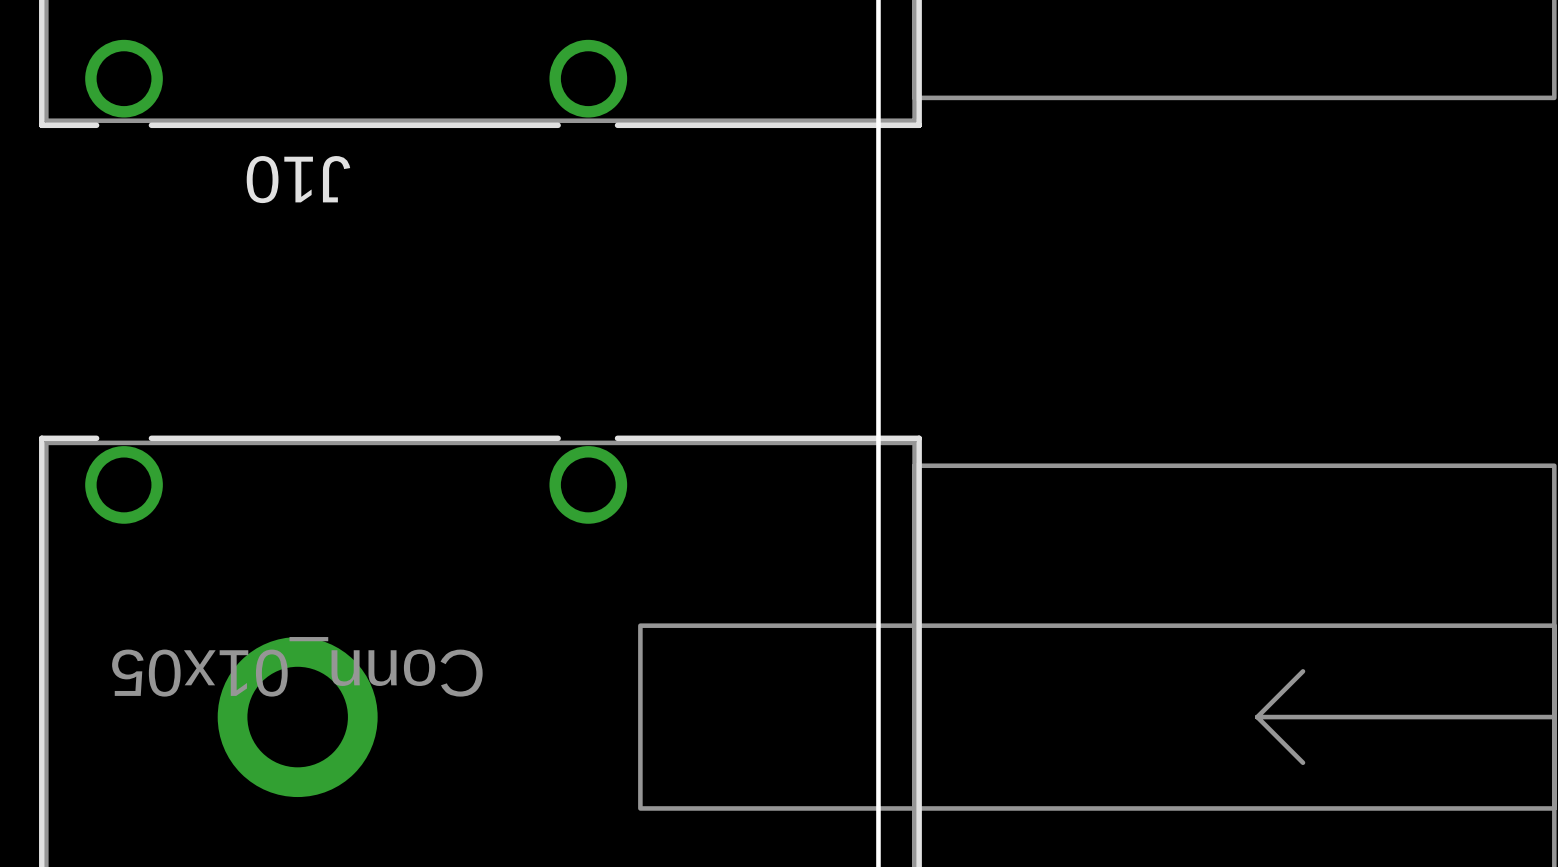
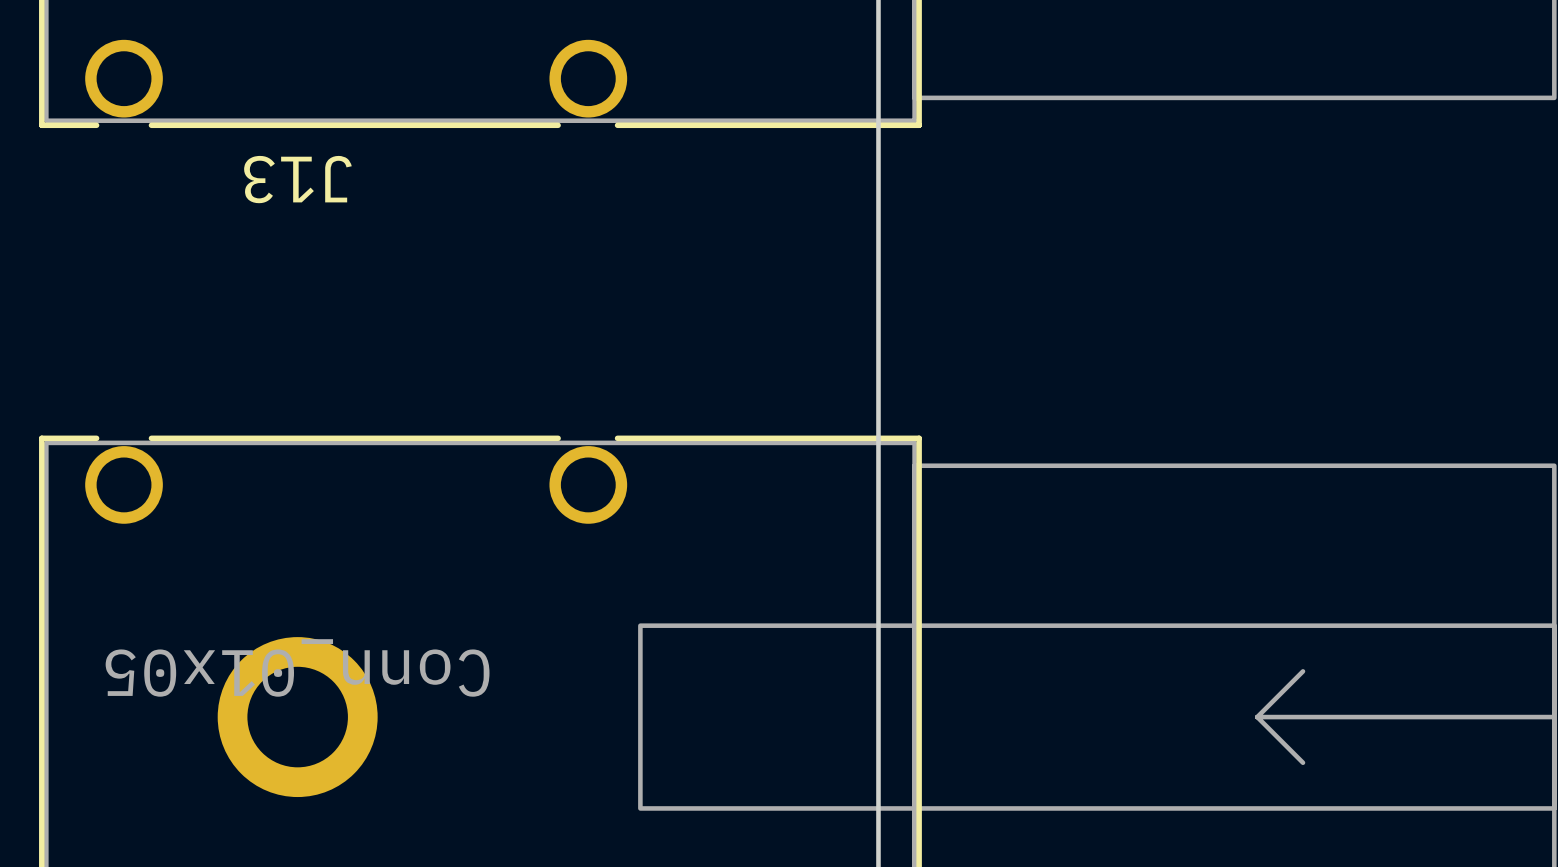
J10 name: J10 (298, 179) -> J13 (297, 179)

